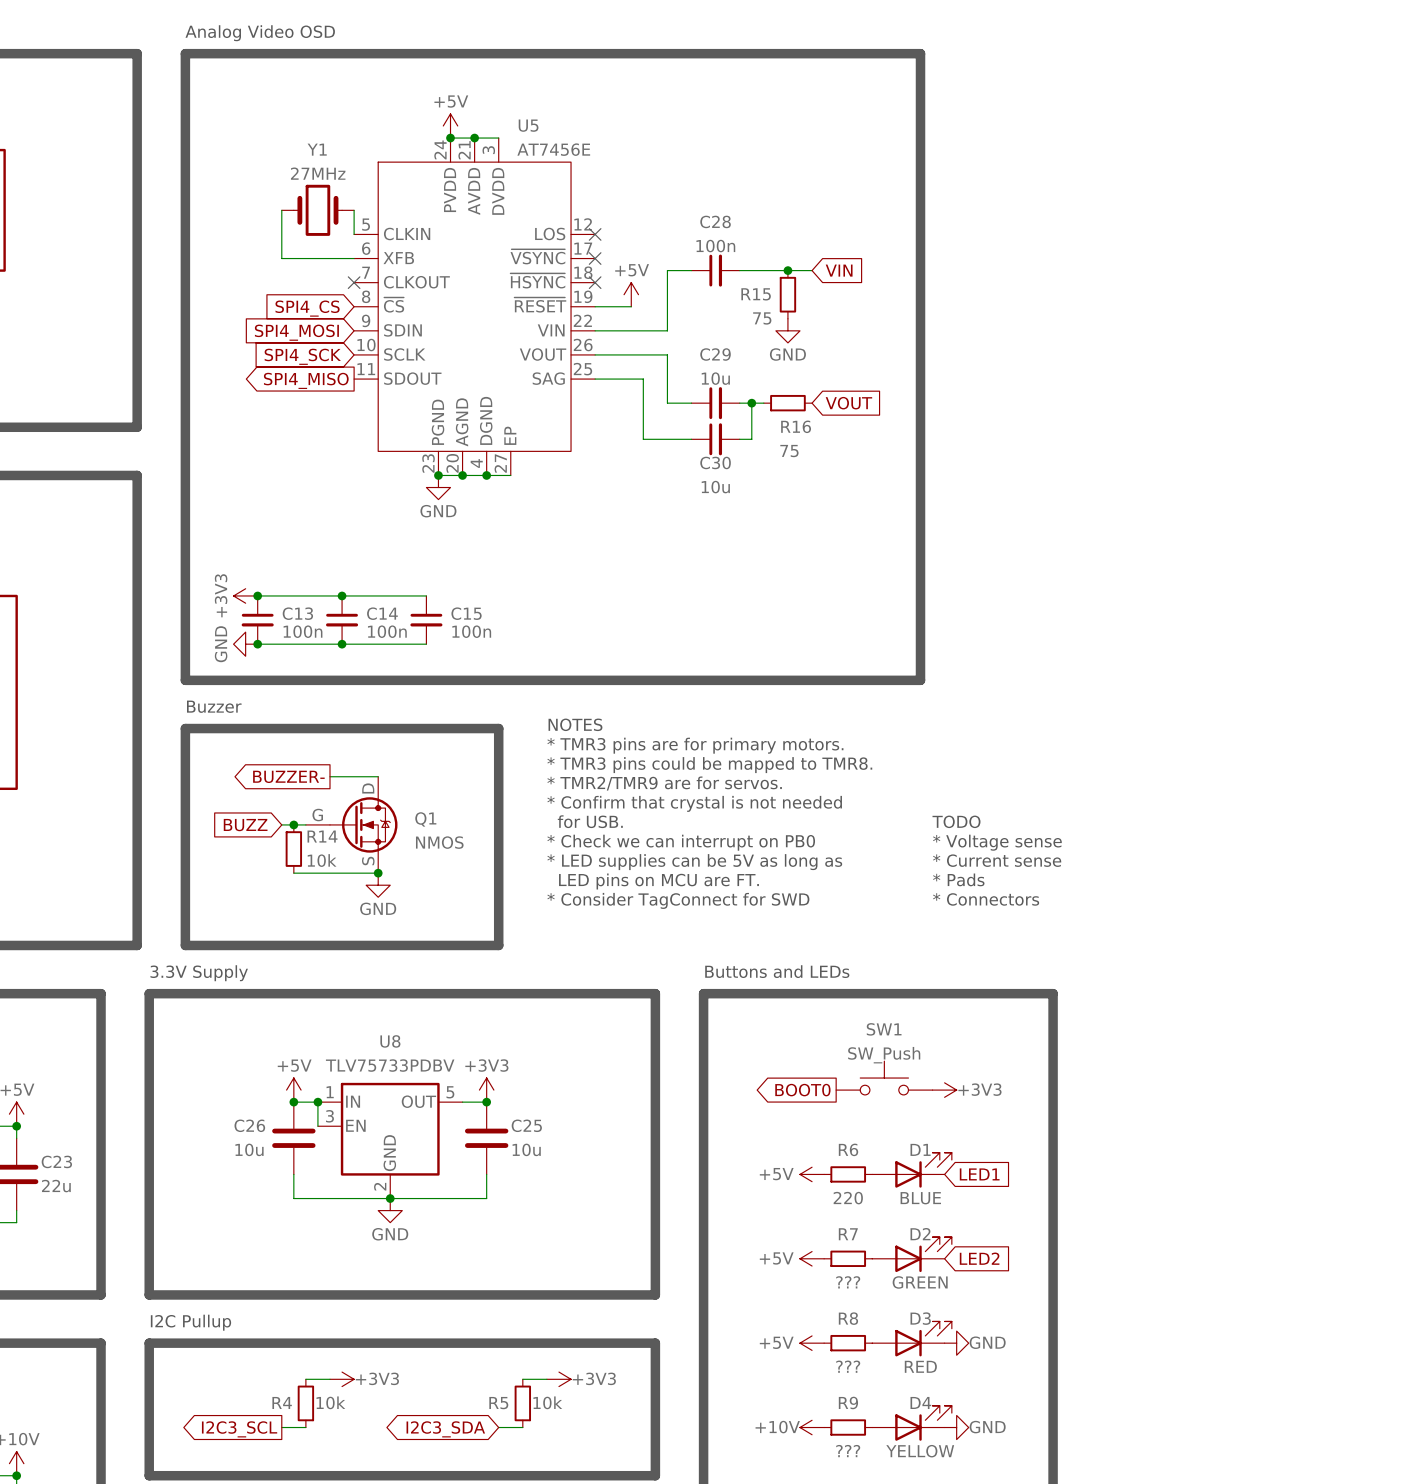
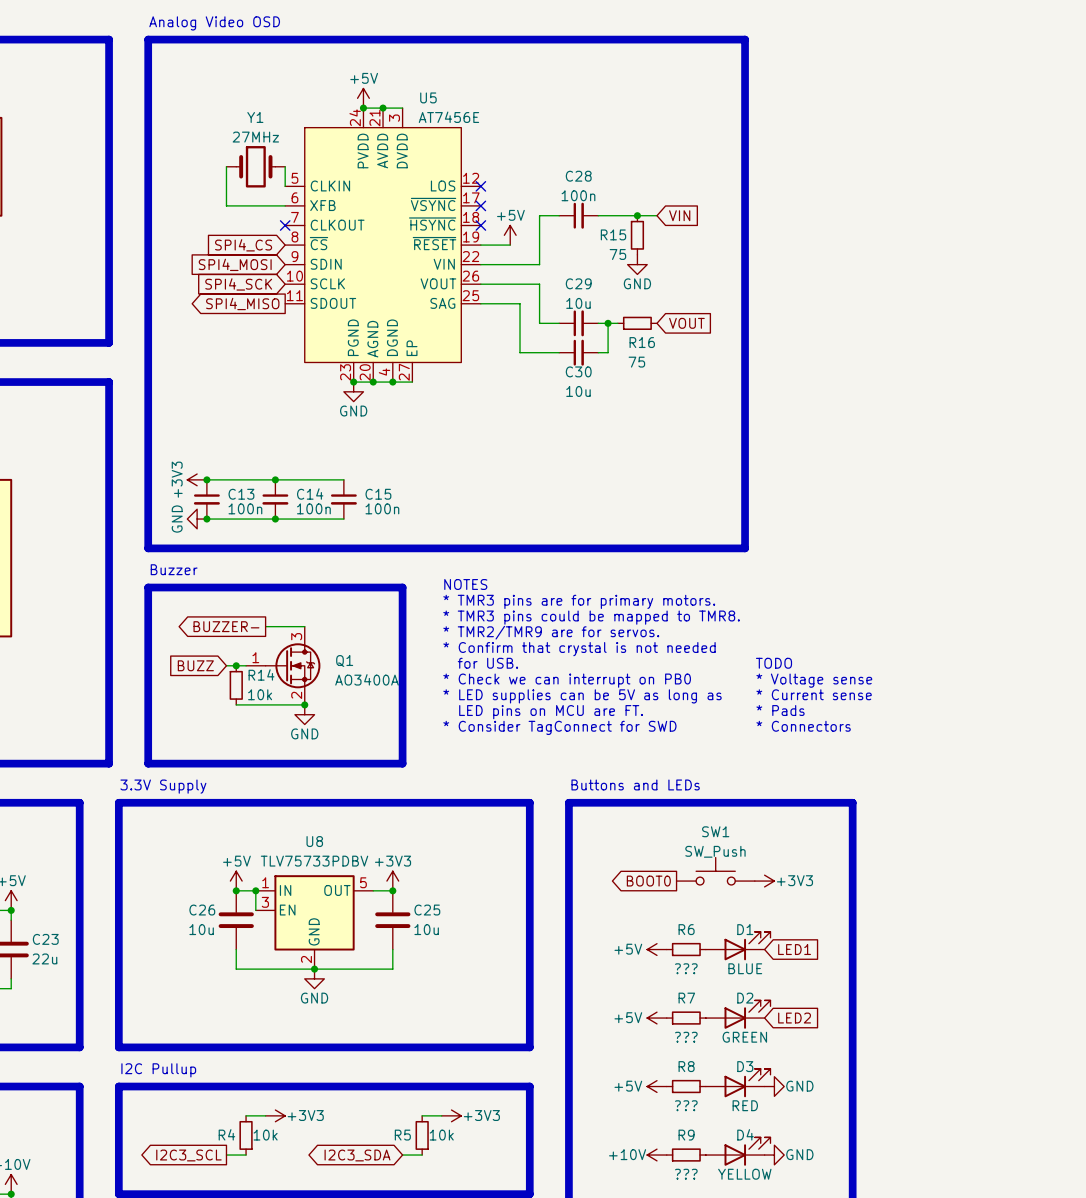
Q1 pin name: D (368, 788) -> none
Q1 pin number: none -> 3 (296, 636)
Q1 pin name: G (317, 815) -> none
Q1 pin number: none -> 1 (255, 657)
Q1 value: NMOS (439, 842) -> AO3400A (367, 679)
Q1 pin name: S (368, 861) -> none
Q1 pin number: none -> 2 (296, 695)
R6 value: 220 (848, 1198) -> ??? (686, 968)

